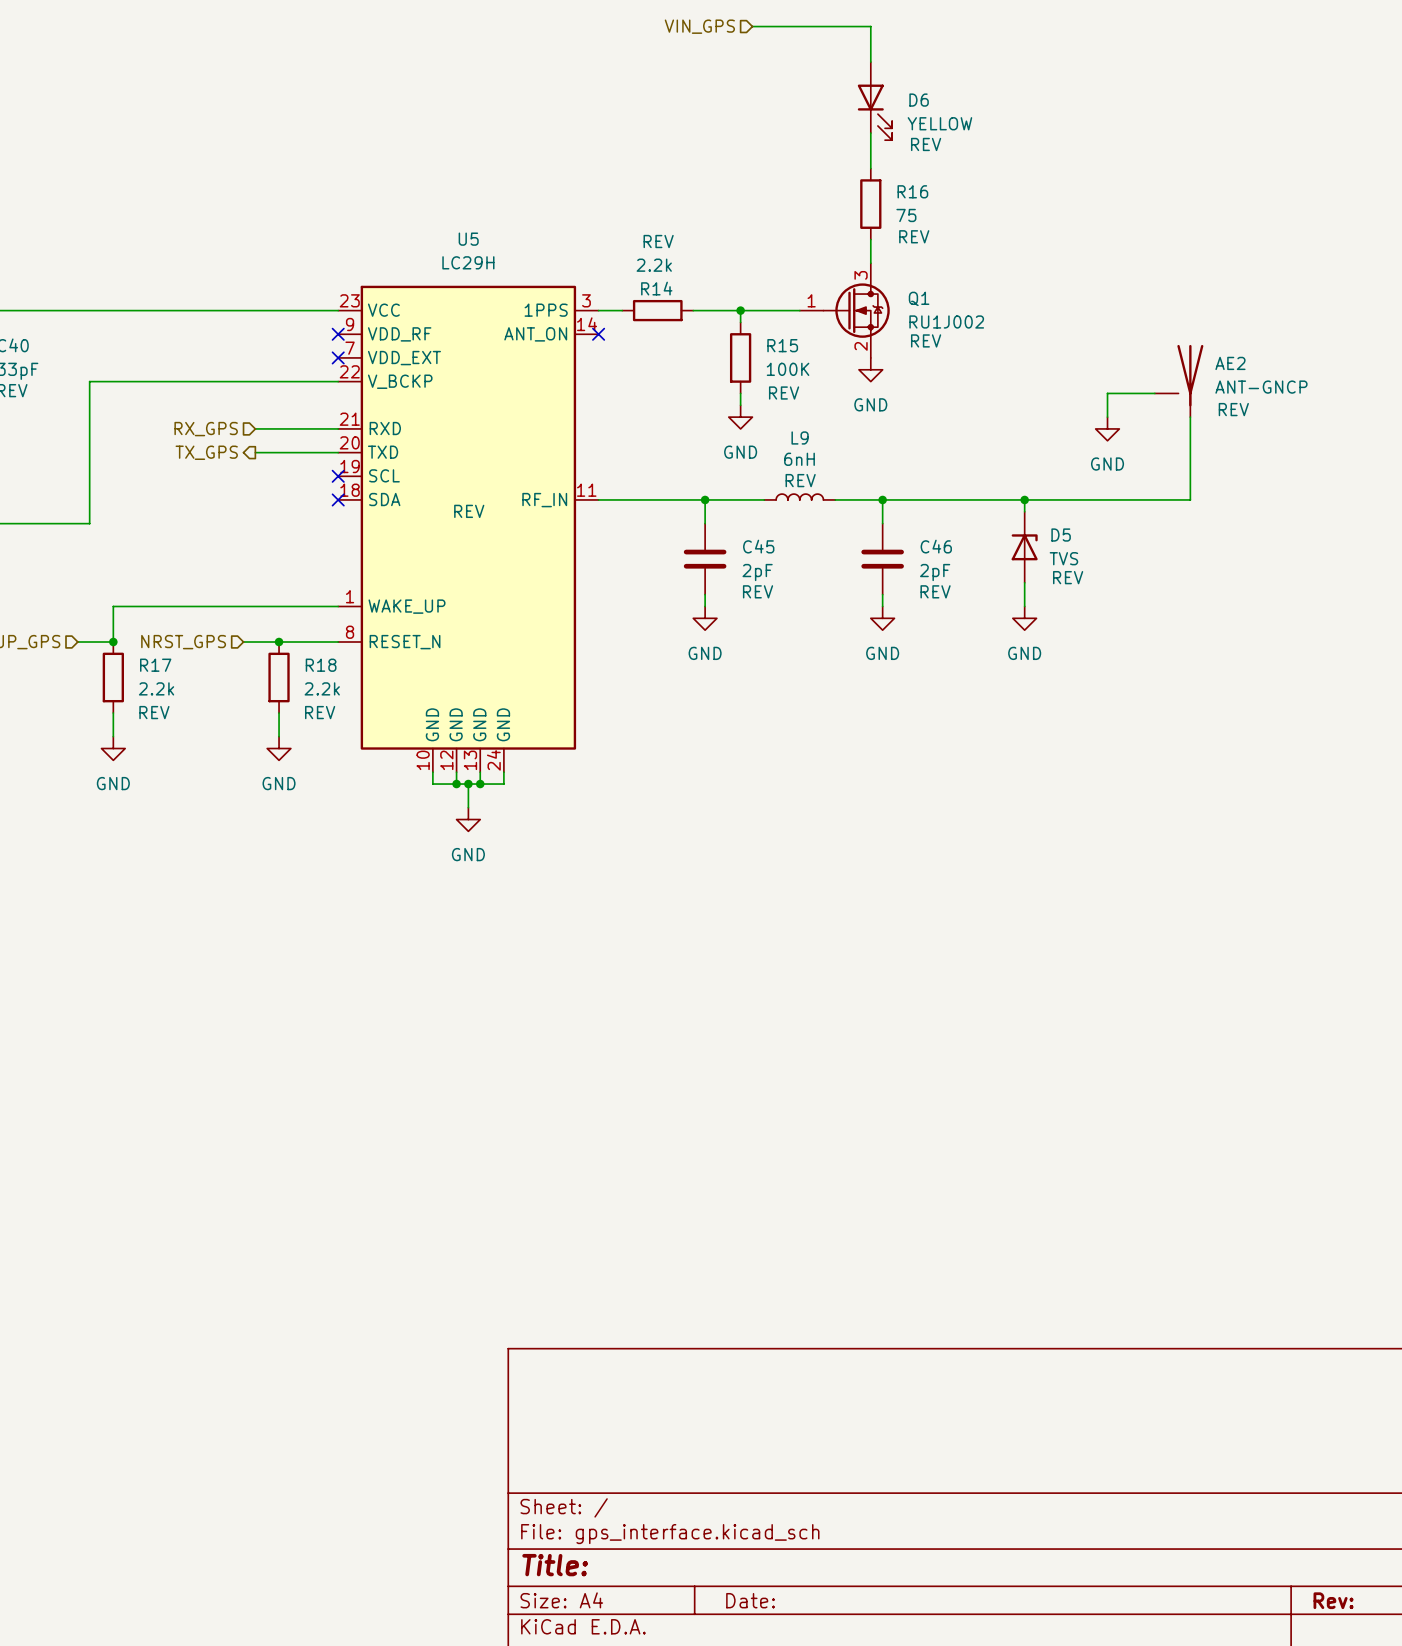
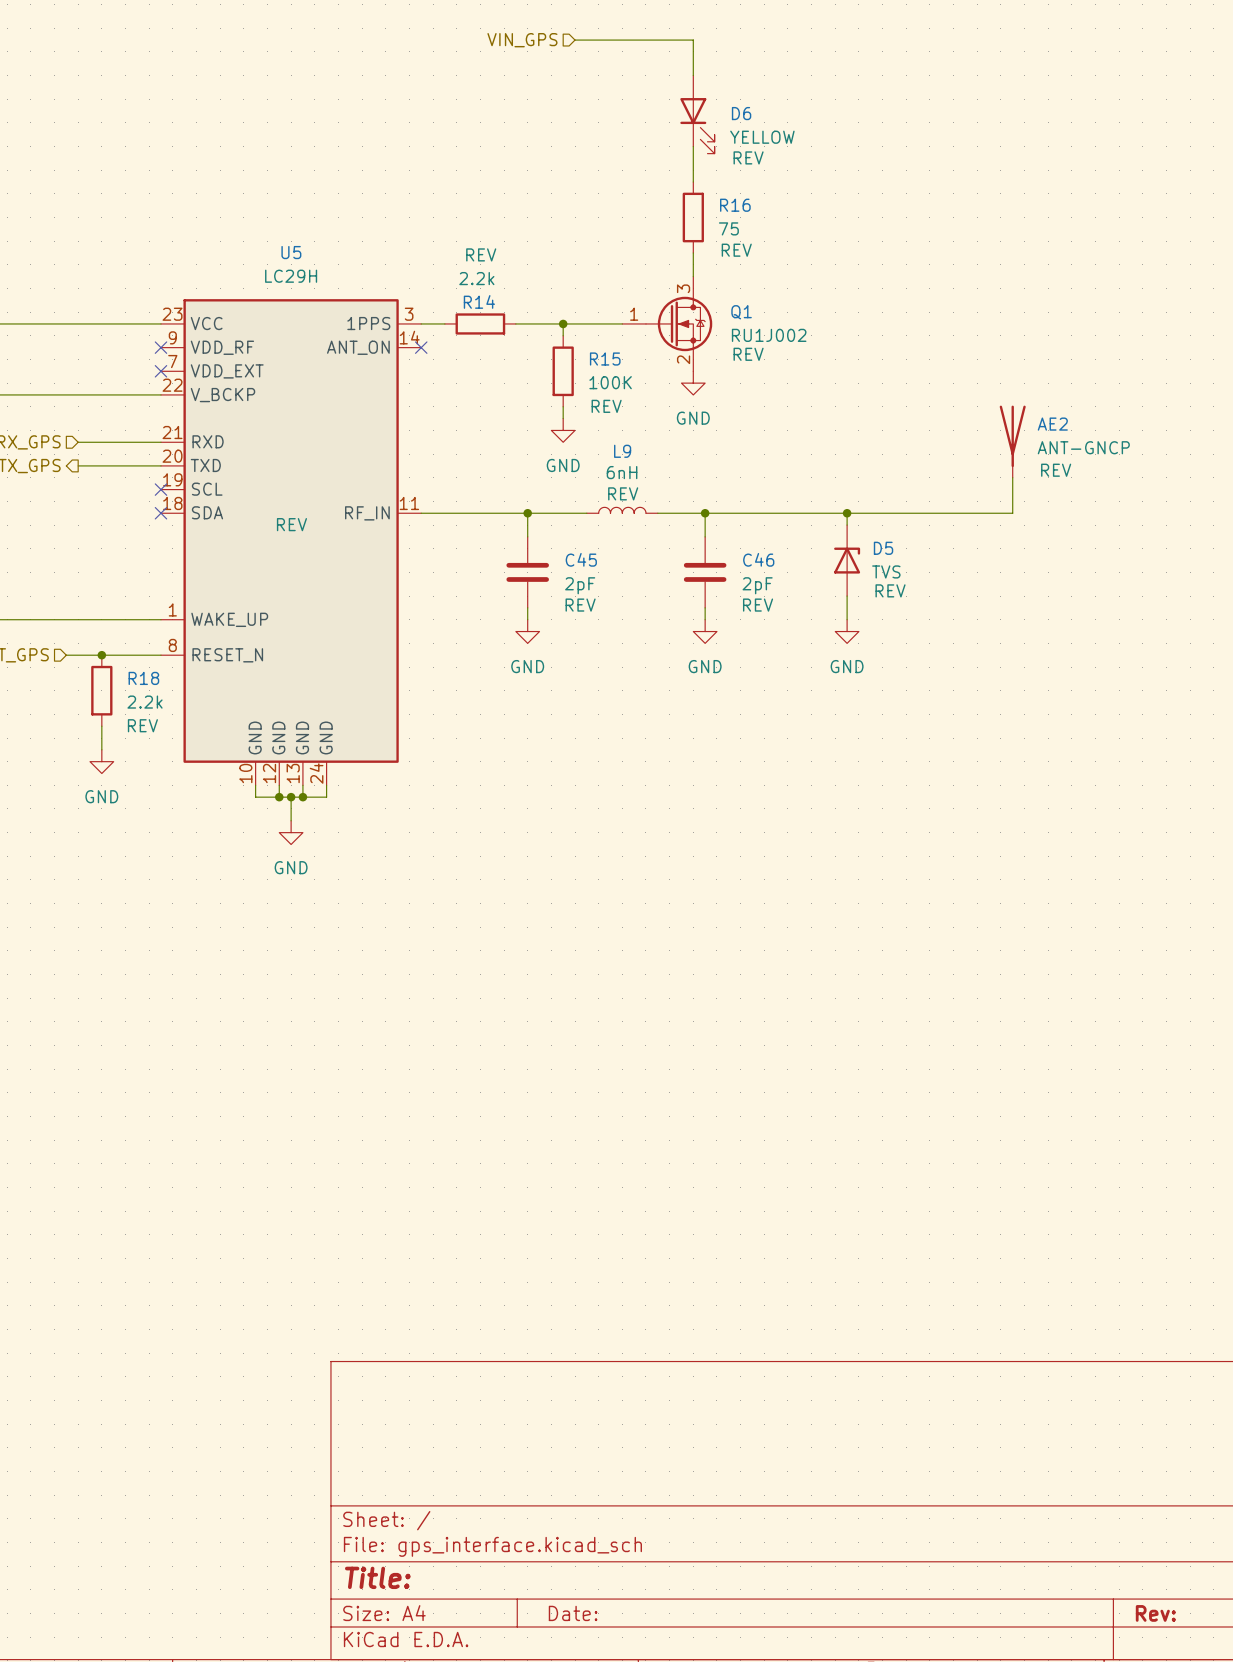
AE2 symbol: [1154, 344, 1204, 418] -> [999, 405, 1026, 478]
wire: (1154, 393) (1107, 393) (1107, 417) -> none
power symbol: GND (1107, 428) -> none

